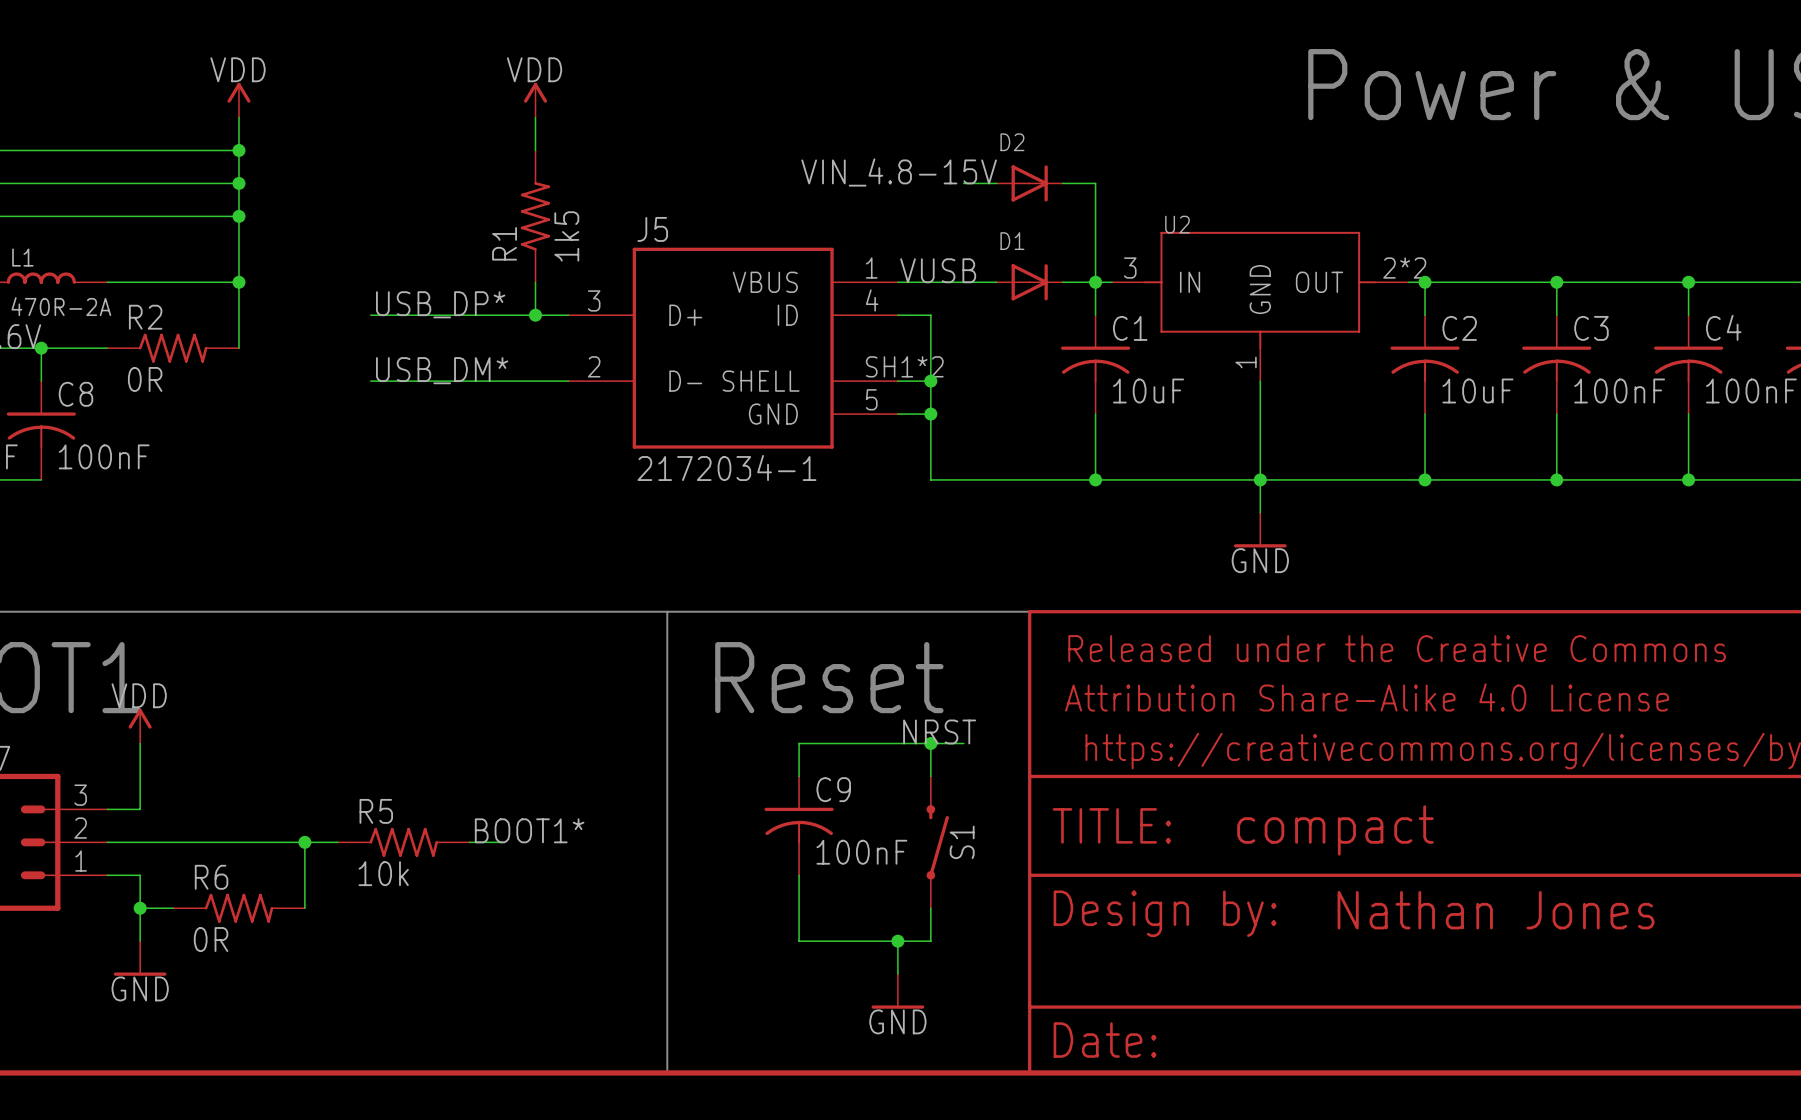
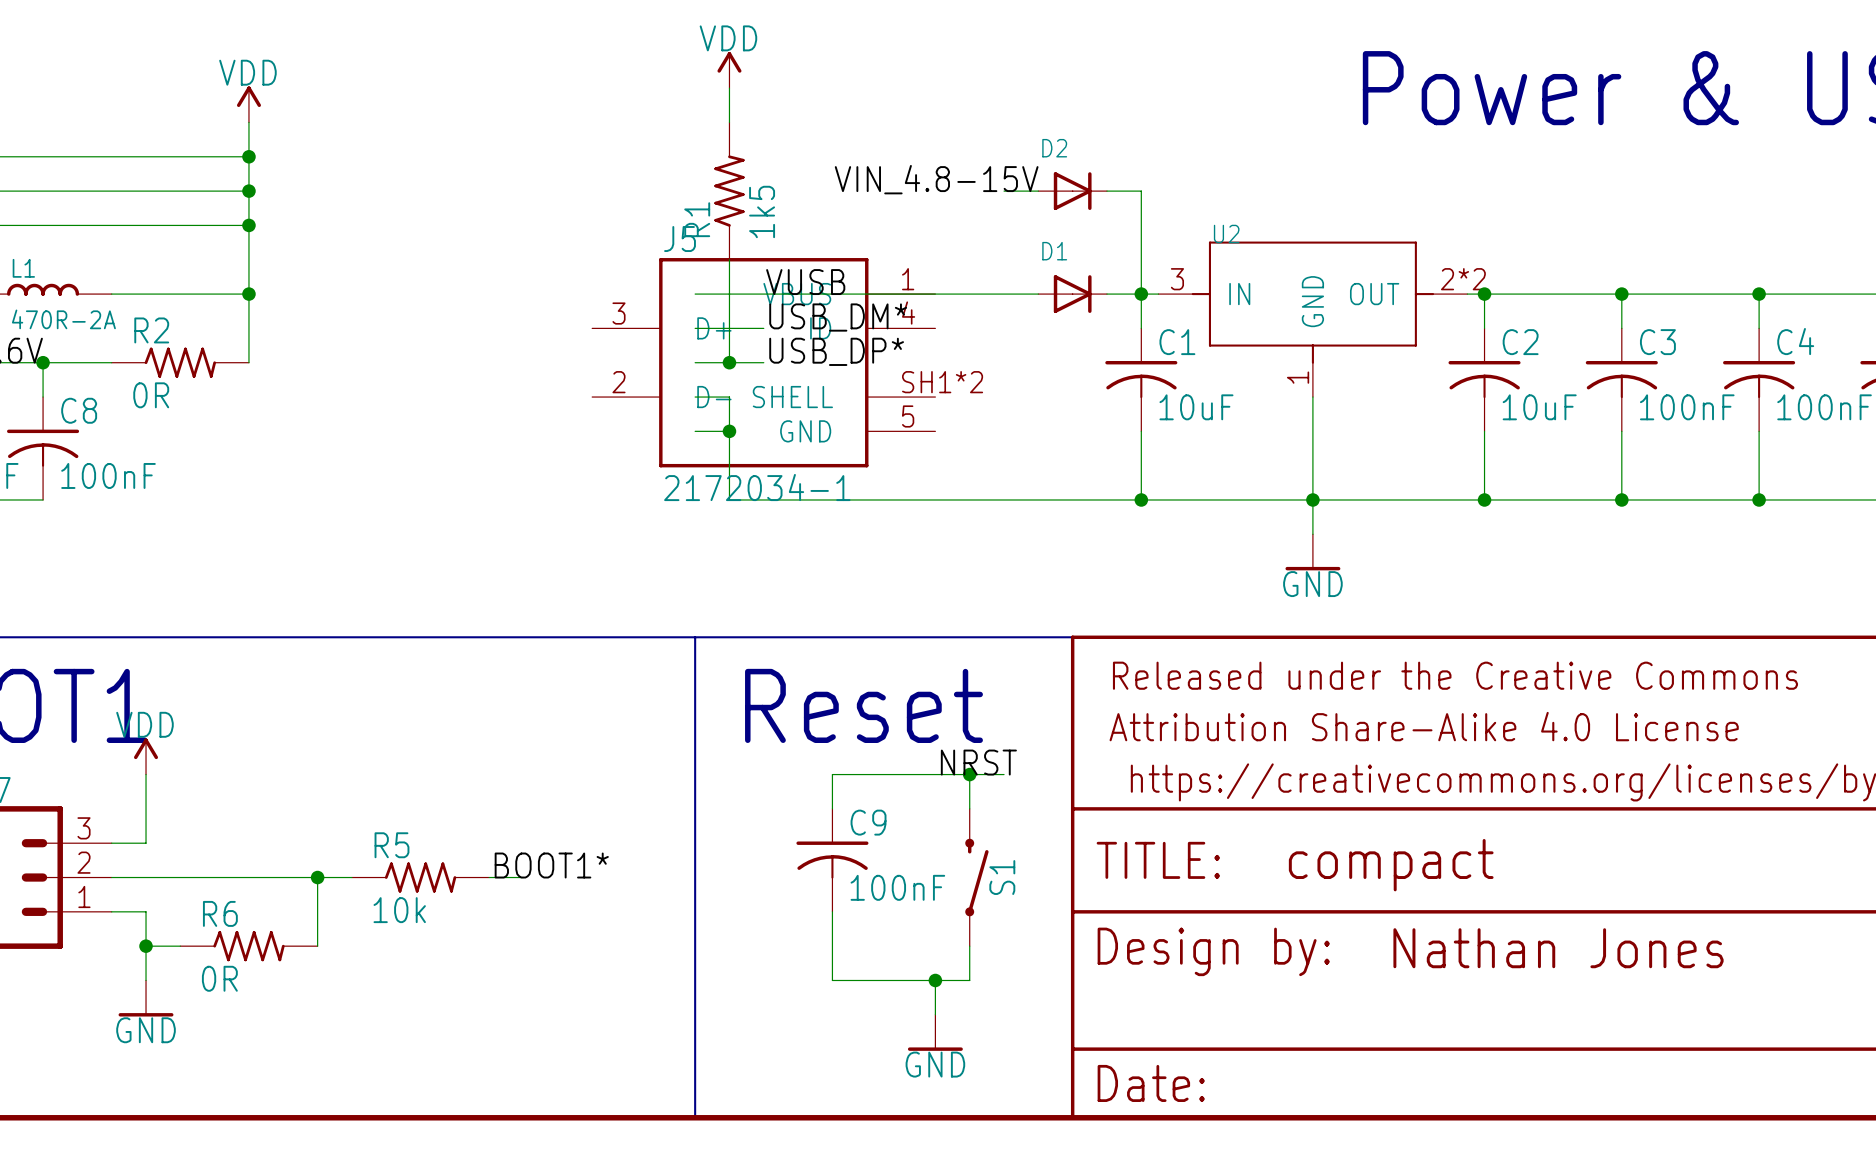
power symbol position: VDD (535, 100) -> VDD (729, 70)
wire: (535, 117) (535, 150) -> (729, 88) (729, 122)
R1 position: (535, 216) -> (729, 191)
wire: none -> (729, 259) (729, 362)
label position: VUSB (938, 270) -> VUSB (805, 282)
wire: (535, 282) (535, 315) -> none
wire: none -> (695, 294) (935, 294)
label: USB_DP* (440, 304) -> none
label: none -> USB_DM* (838, 317)
wire: (370, 315) (568, 315) -> none
junction: (535, 315) -> none
wire: none -> (695, 328) (763, 328)
wire: (897, 315) (930, 315) (930, 479) -> (695, 397) (729, 397) (729, 499) (969, 499)
label: none -> USB_DP* (836, 351)
wire: none -> (695, 362) (763, 362)
junction: none -> (729, 362)
label: USB_DM* (442, 370) -> none
wire: (370, 381) (568, 381) -> none
wire: (897, 381) (930, 381) -> none
junction: (930, 381) -> none
junction: none -> (729, 431)
wire: (897, 414) (930, 414) -> (695, 431) (729, 431)
junction: (930, 414) -> none

